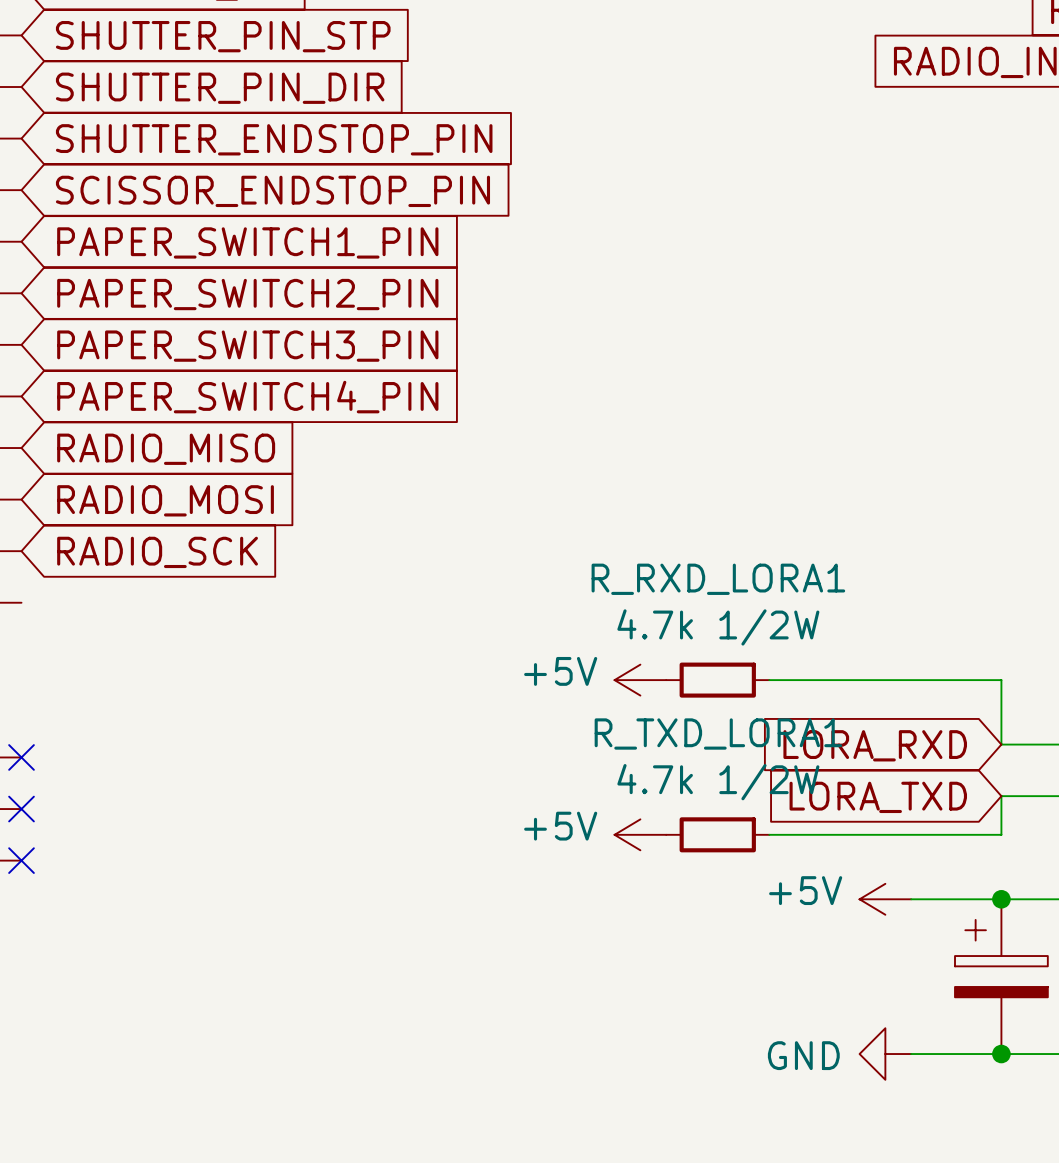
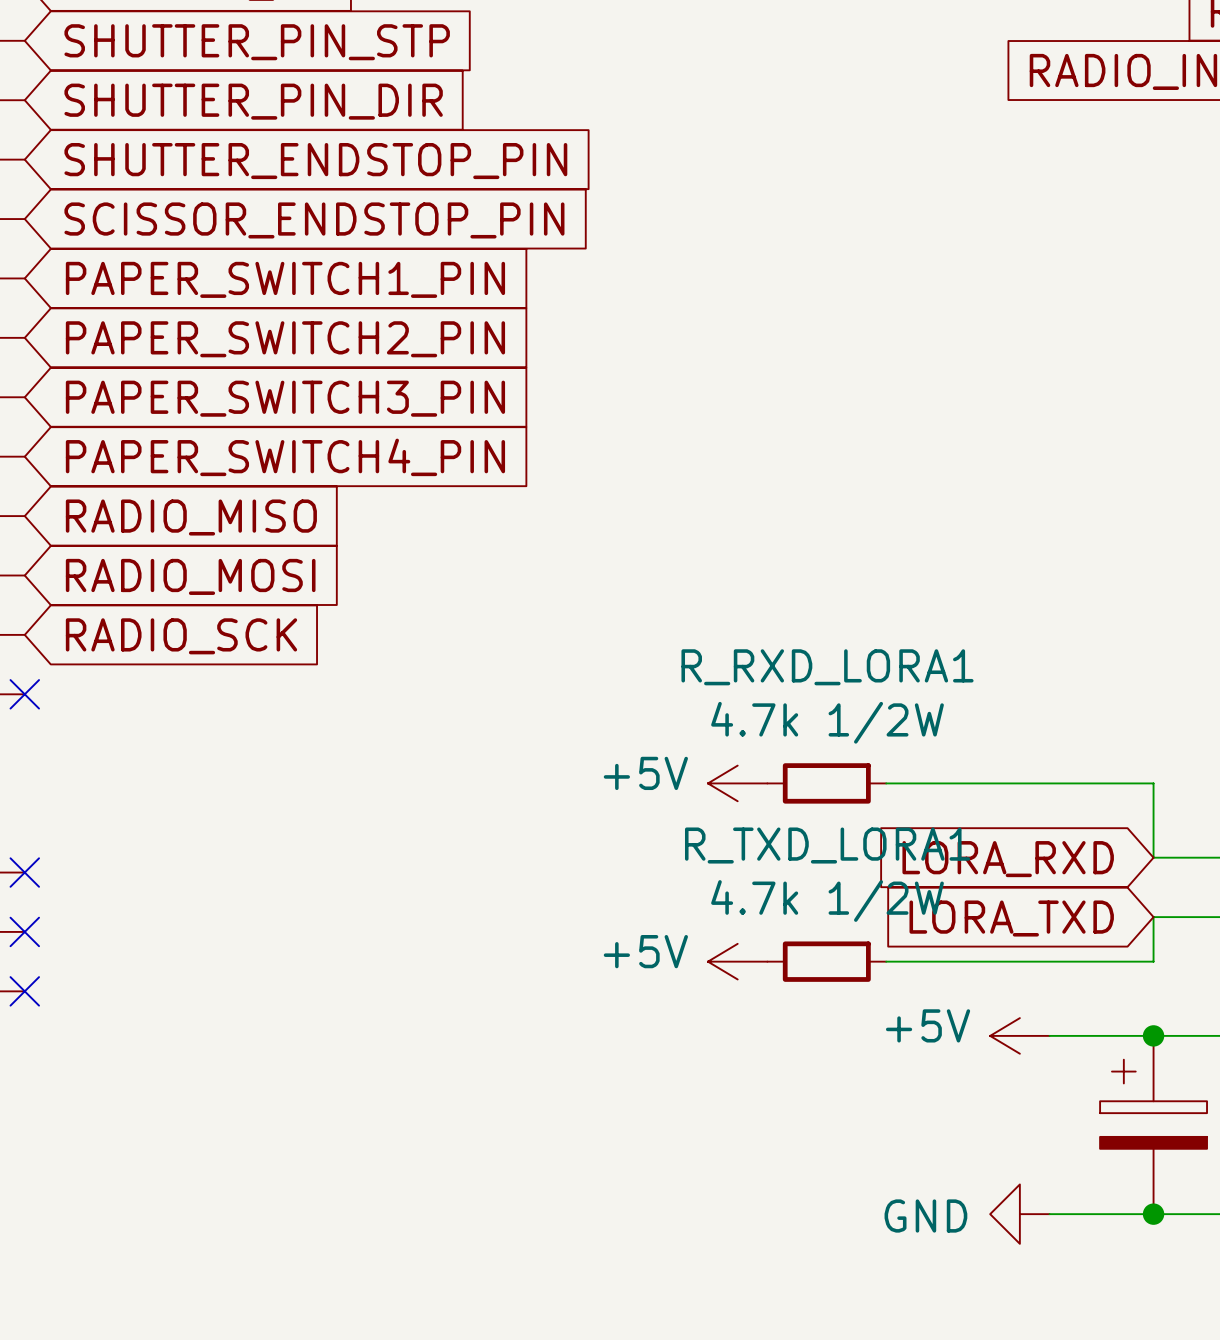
no-connect mark: none -> (24, 694)

